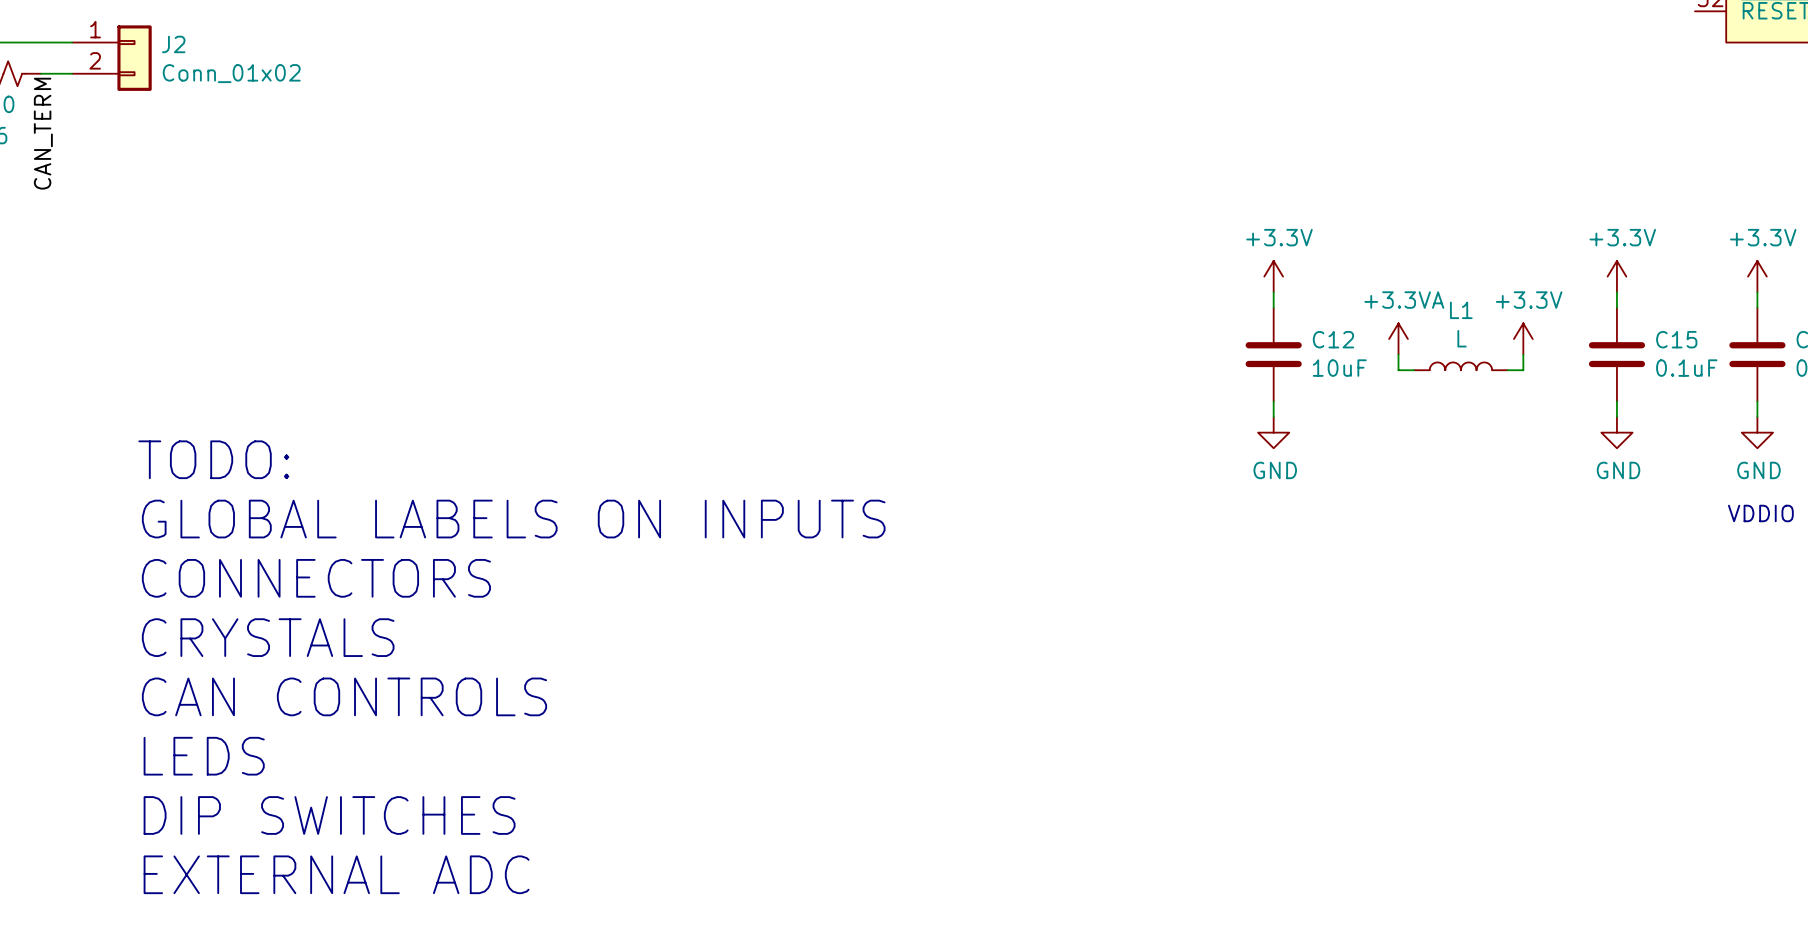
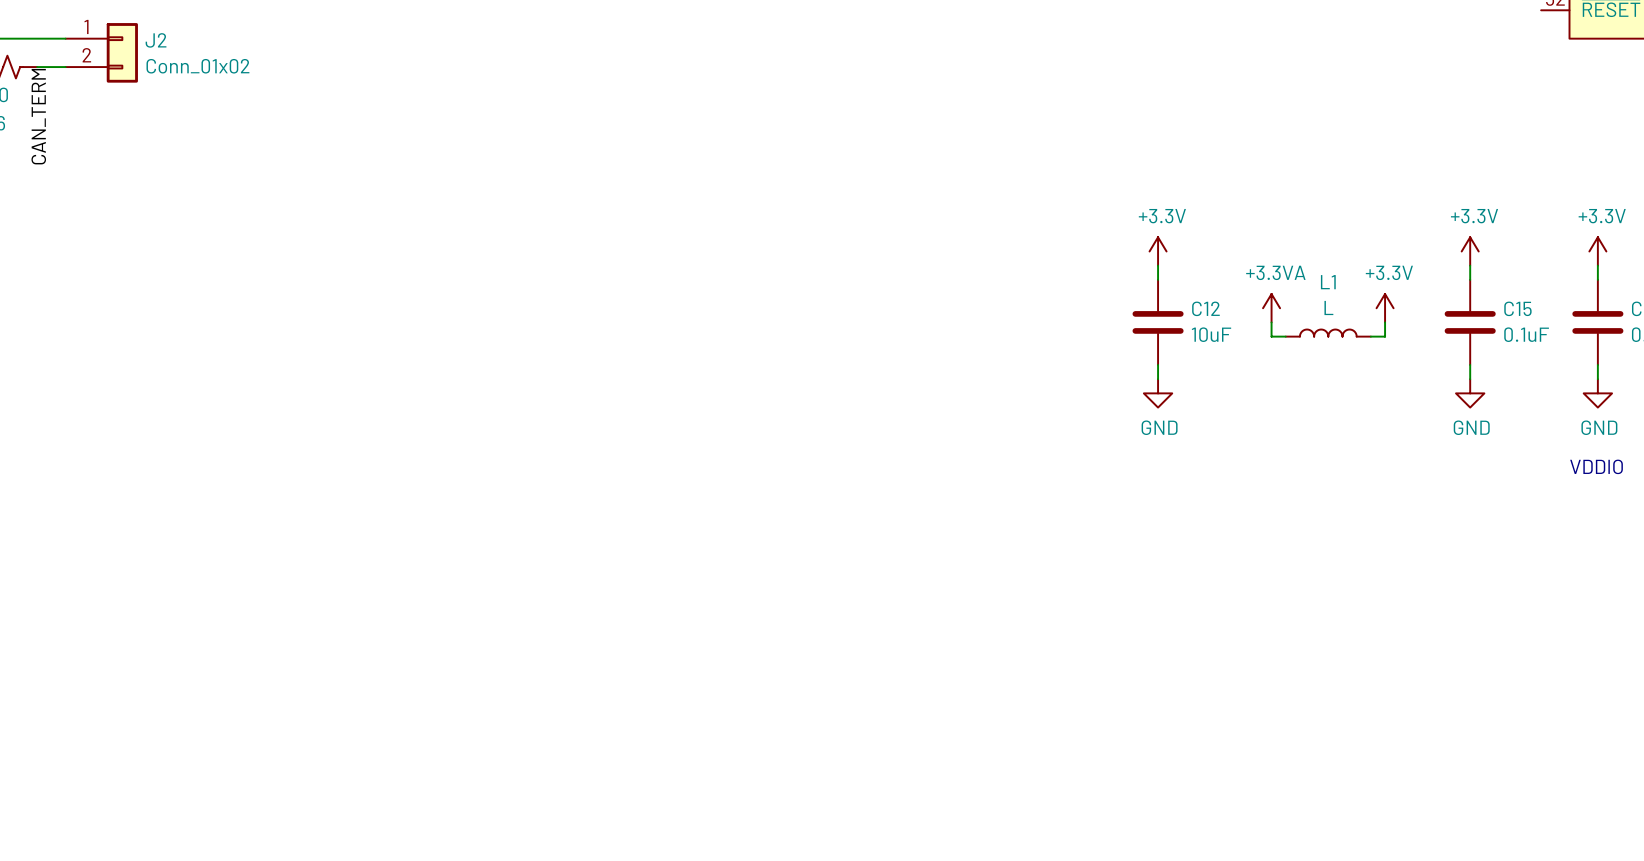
text: TODO: (213, 459) -> none
text: GLOBAL LABELS ON INPUTS (513, 519) -> none
text: CONNECTORS (316, 578) -> none
text: CRYSTALS (268, 637) -> none
text: CAN CONTROLS (344, 696) -> none
text: LEDS (204, 756) -> none
text: DIP SWITCHES (329, 815) -> none
text: EXTERNAL ADC (336, 874) -> none

